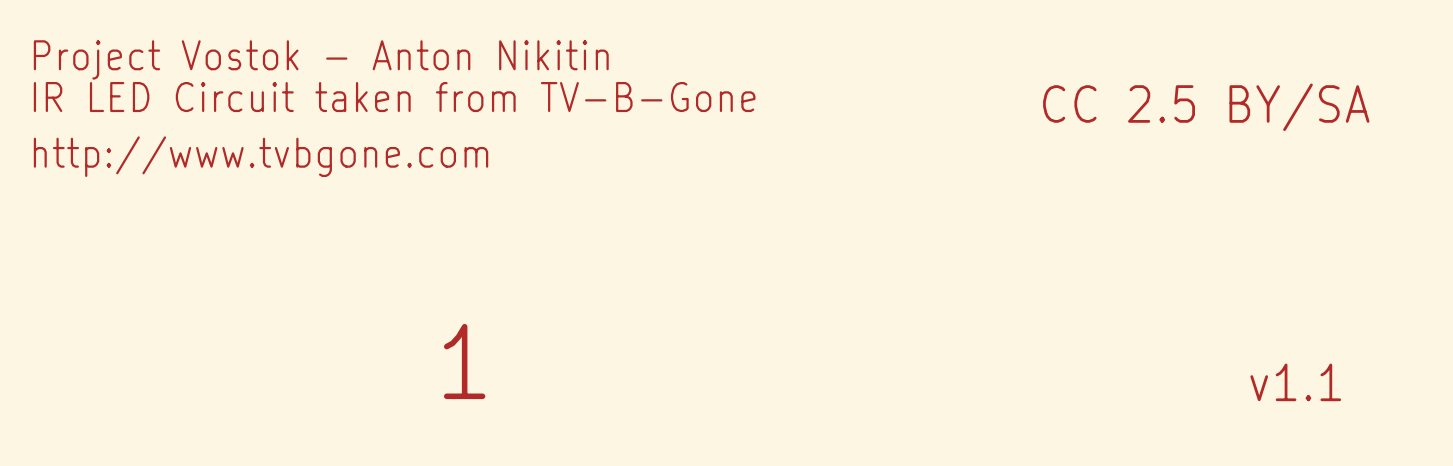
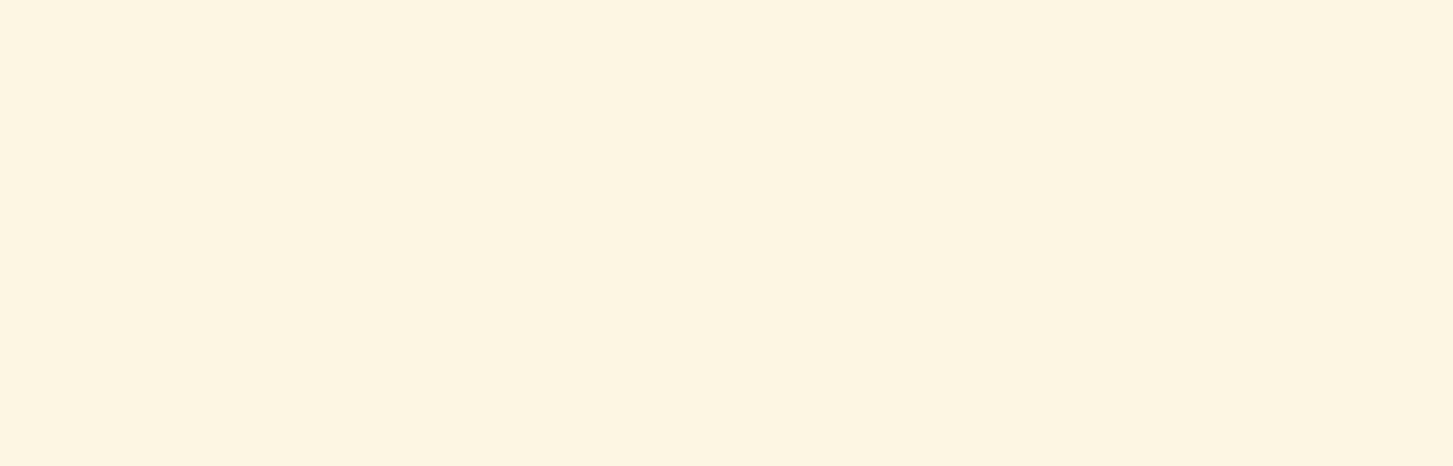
text: Project Vostok - Anton Nikitin (321, 59) -> none
text: IR LED Circuit taken from TV-B-Gone (394, 97) -> none
text: CC 2.5 BY/SA (1206, 107) -> none
text: http://www.tvbgone.com (261, 156) -> none
text: 1 (464, 361) -> none
text: v1.1 (1295, 382) -> none

